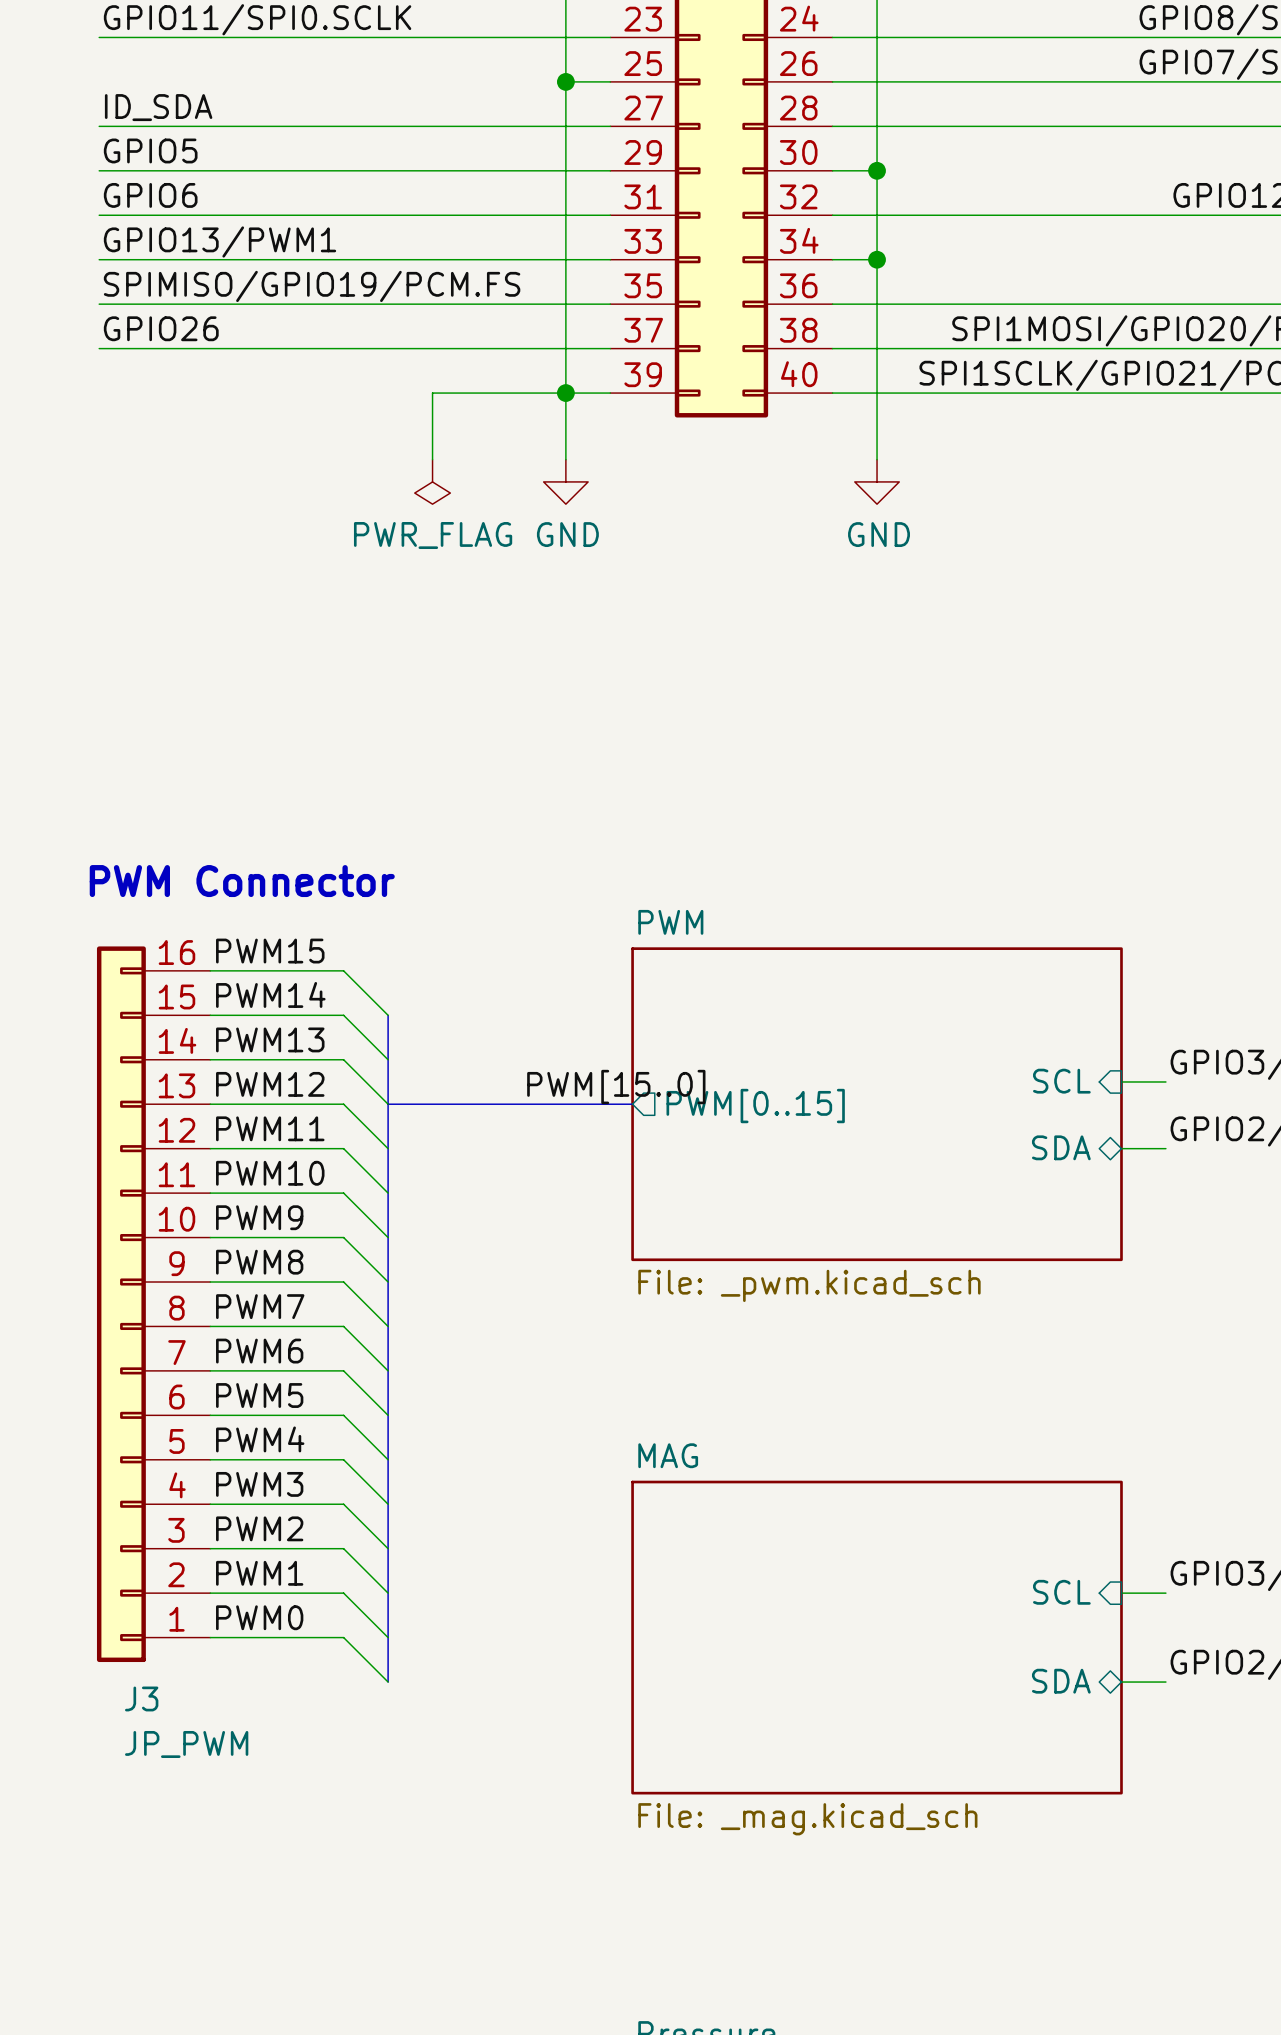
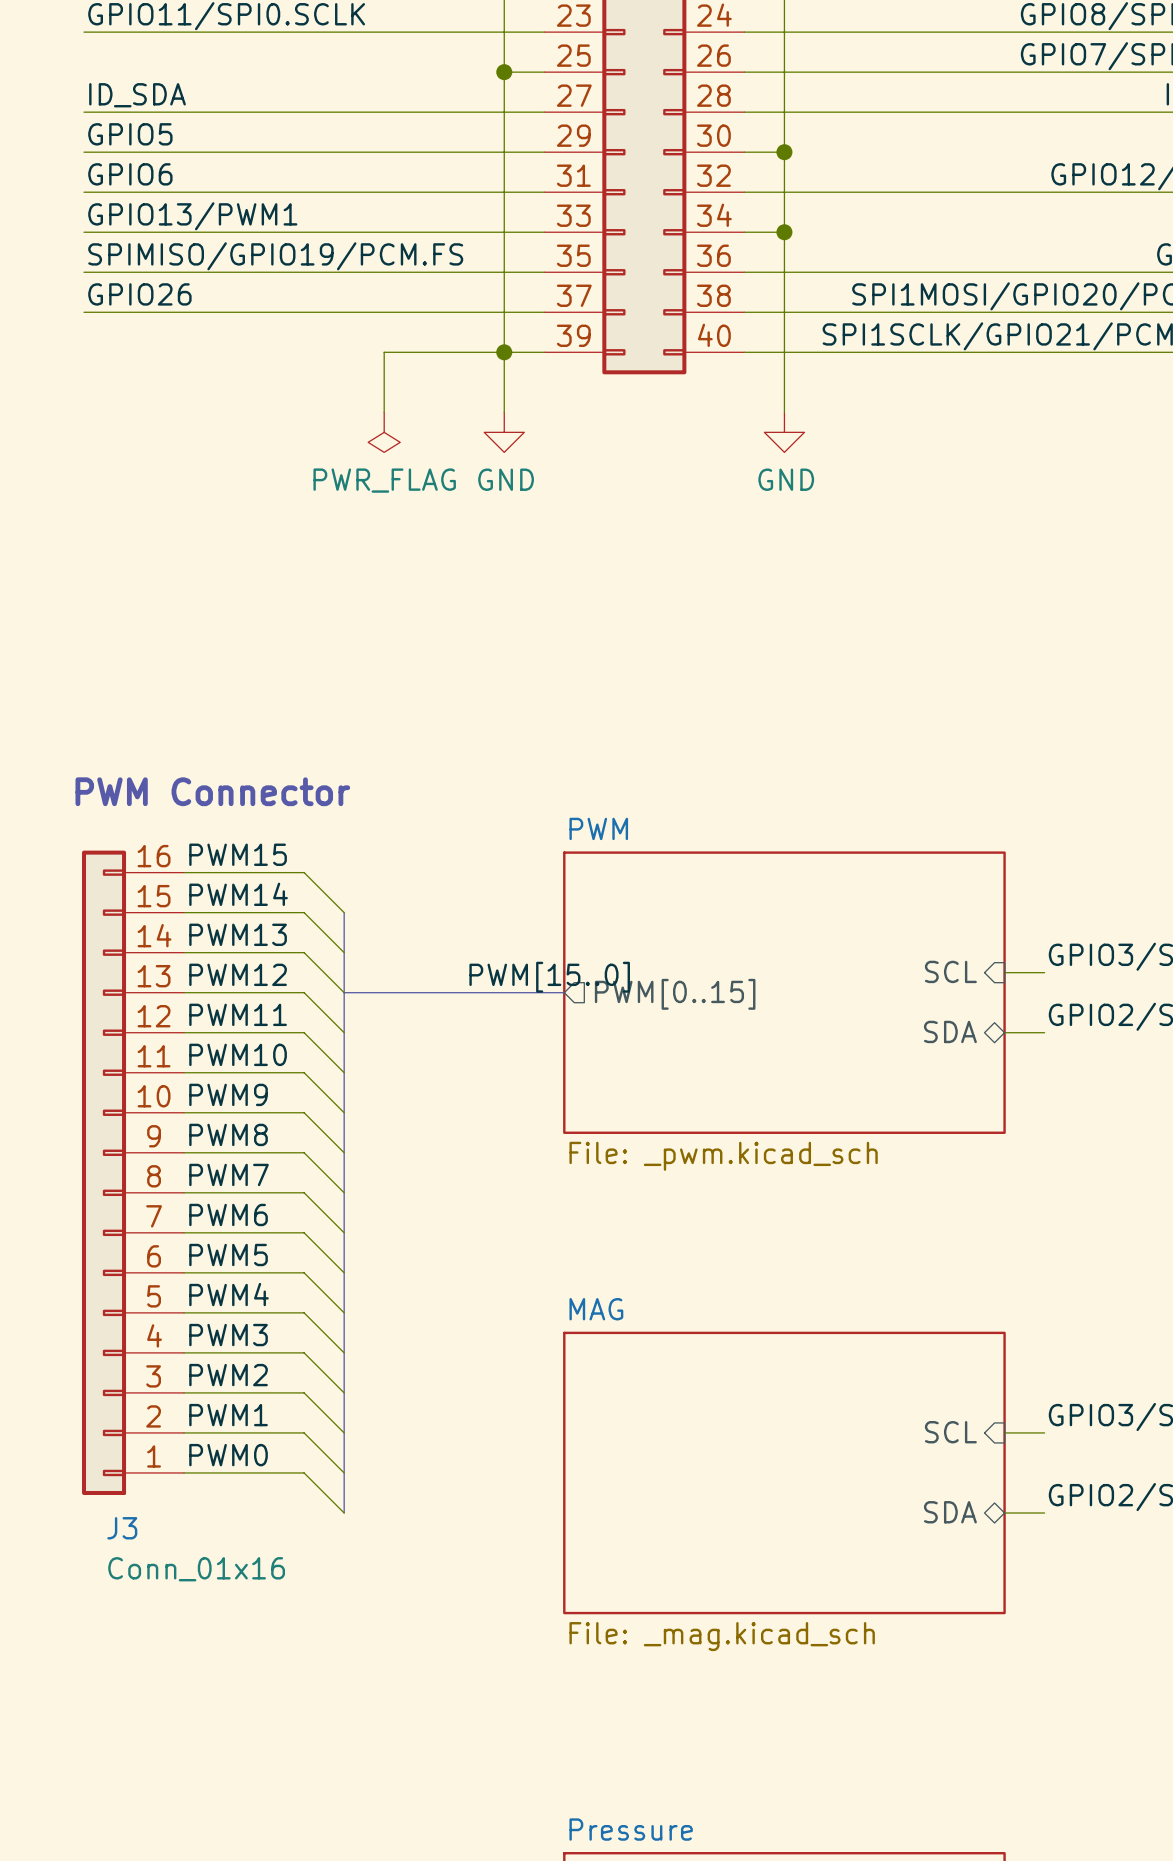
J3 value: JP_PWM (186, 1744) -> Conn_01x16 (196, 1569)

